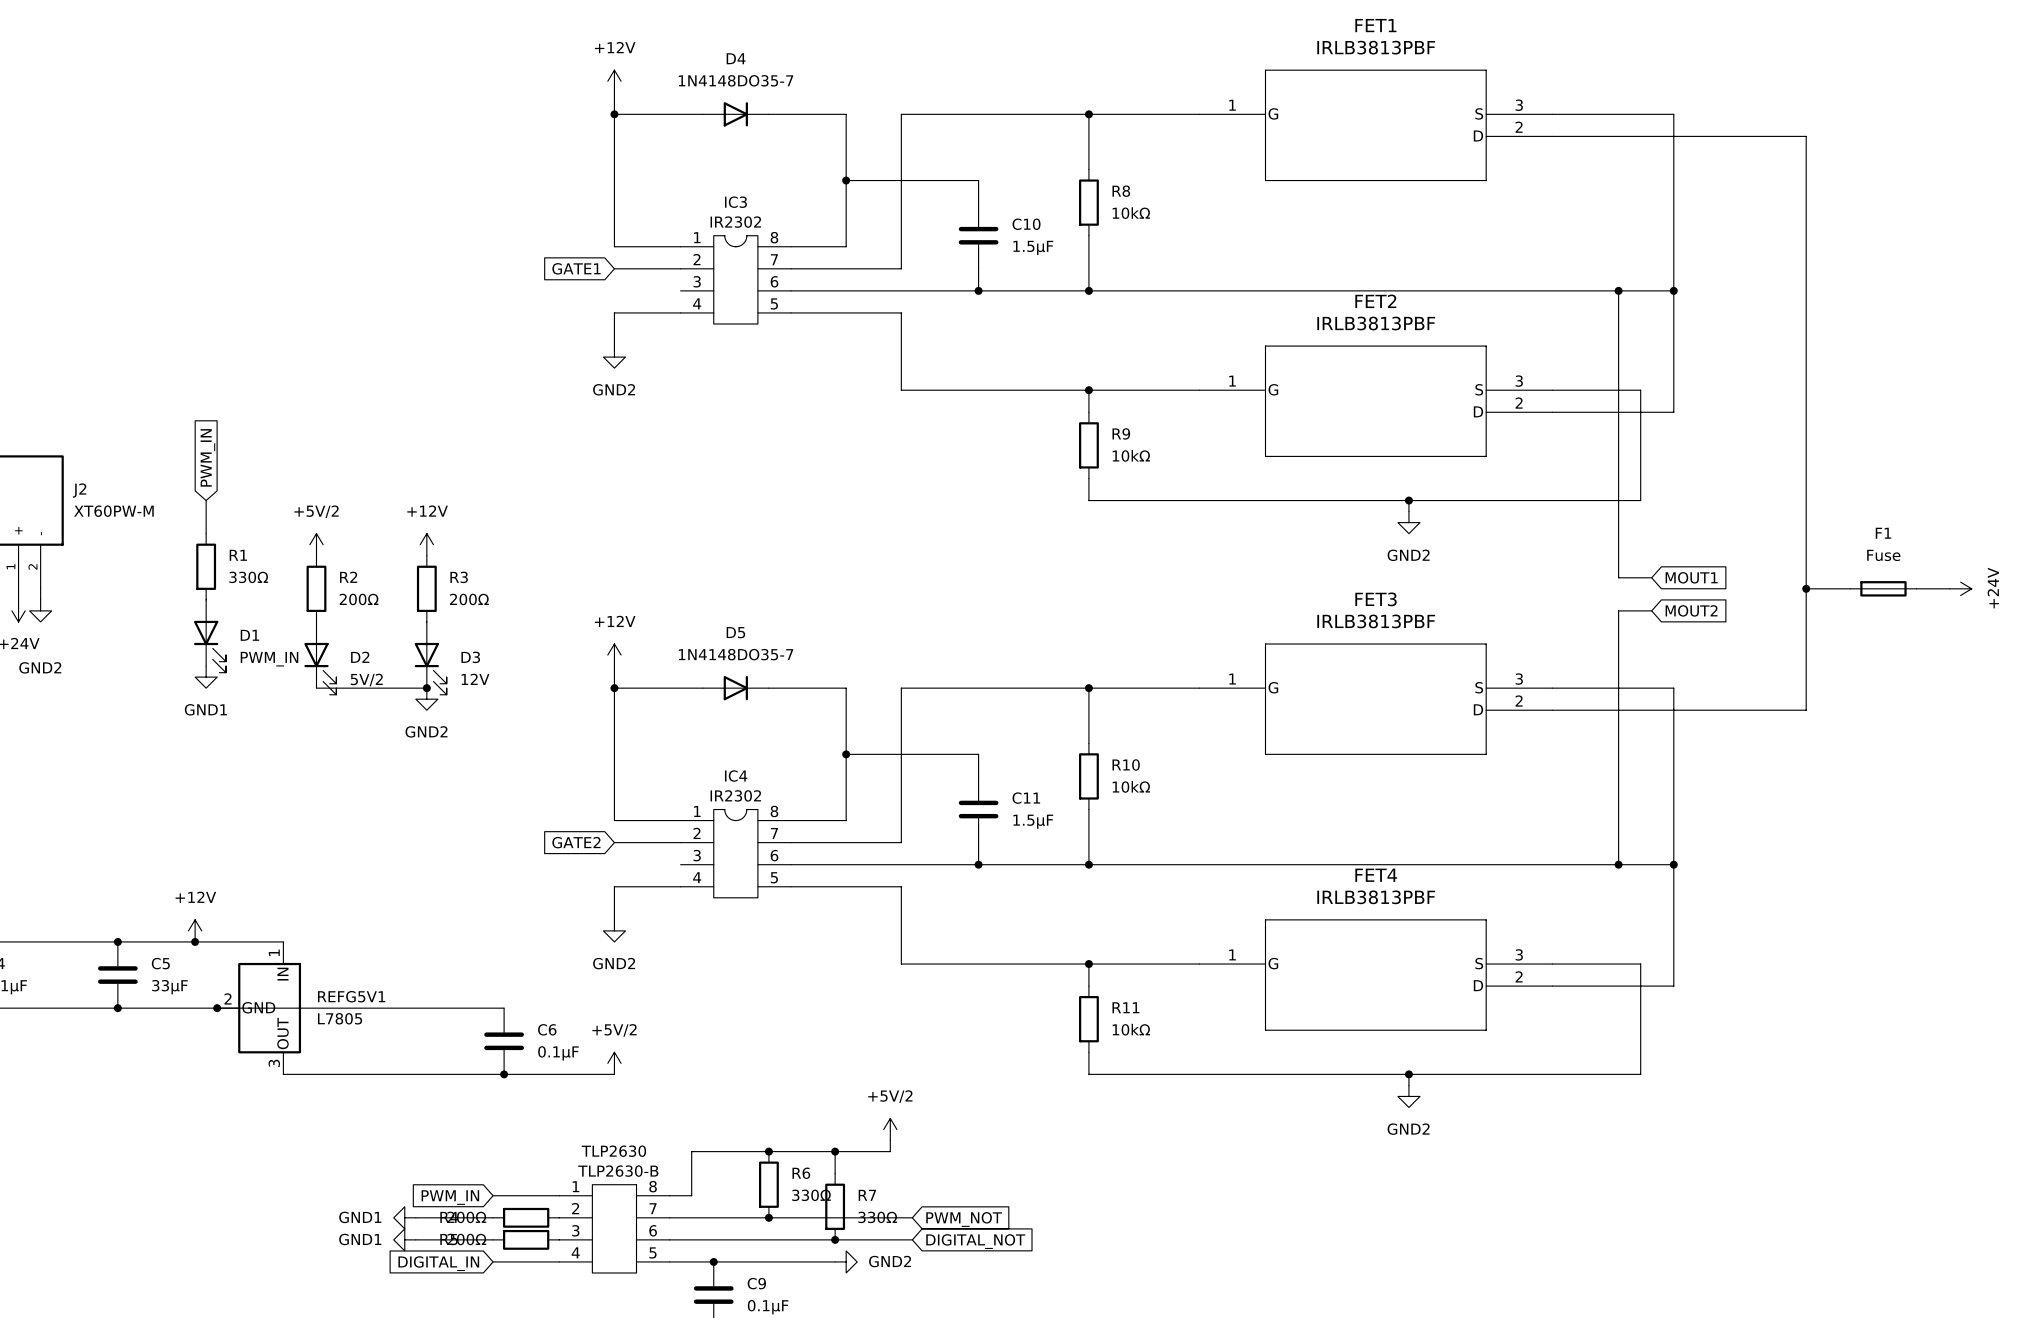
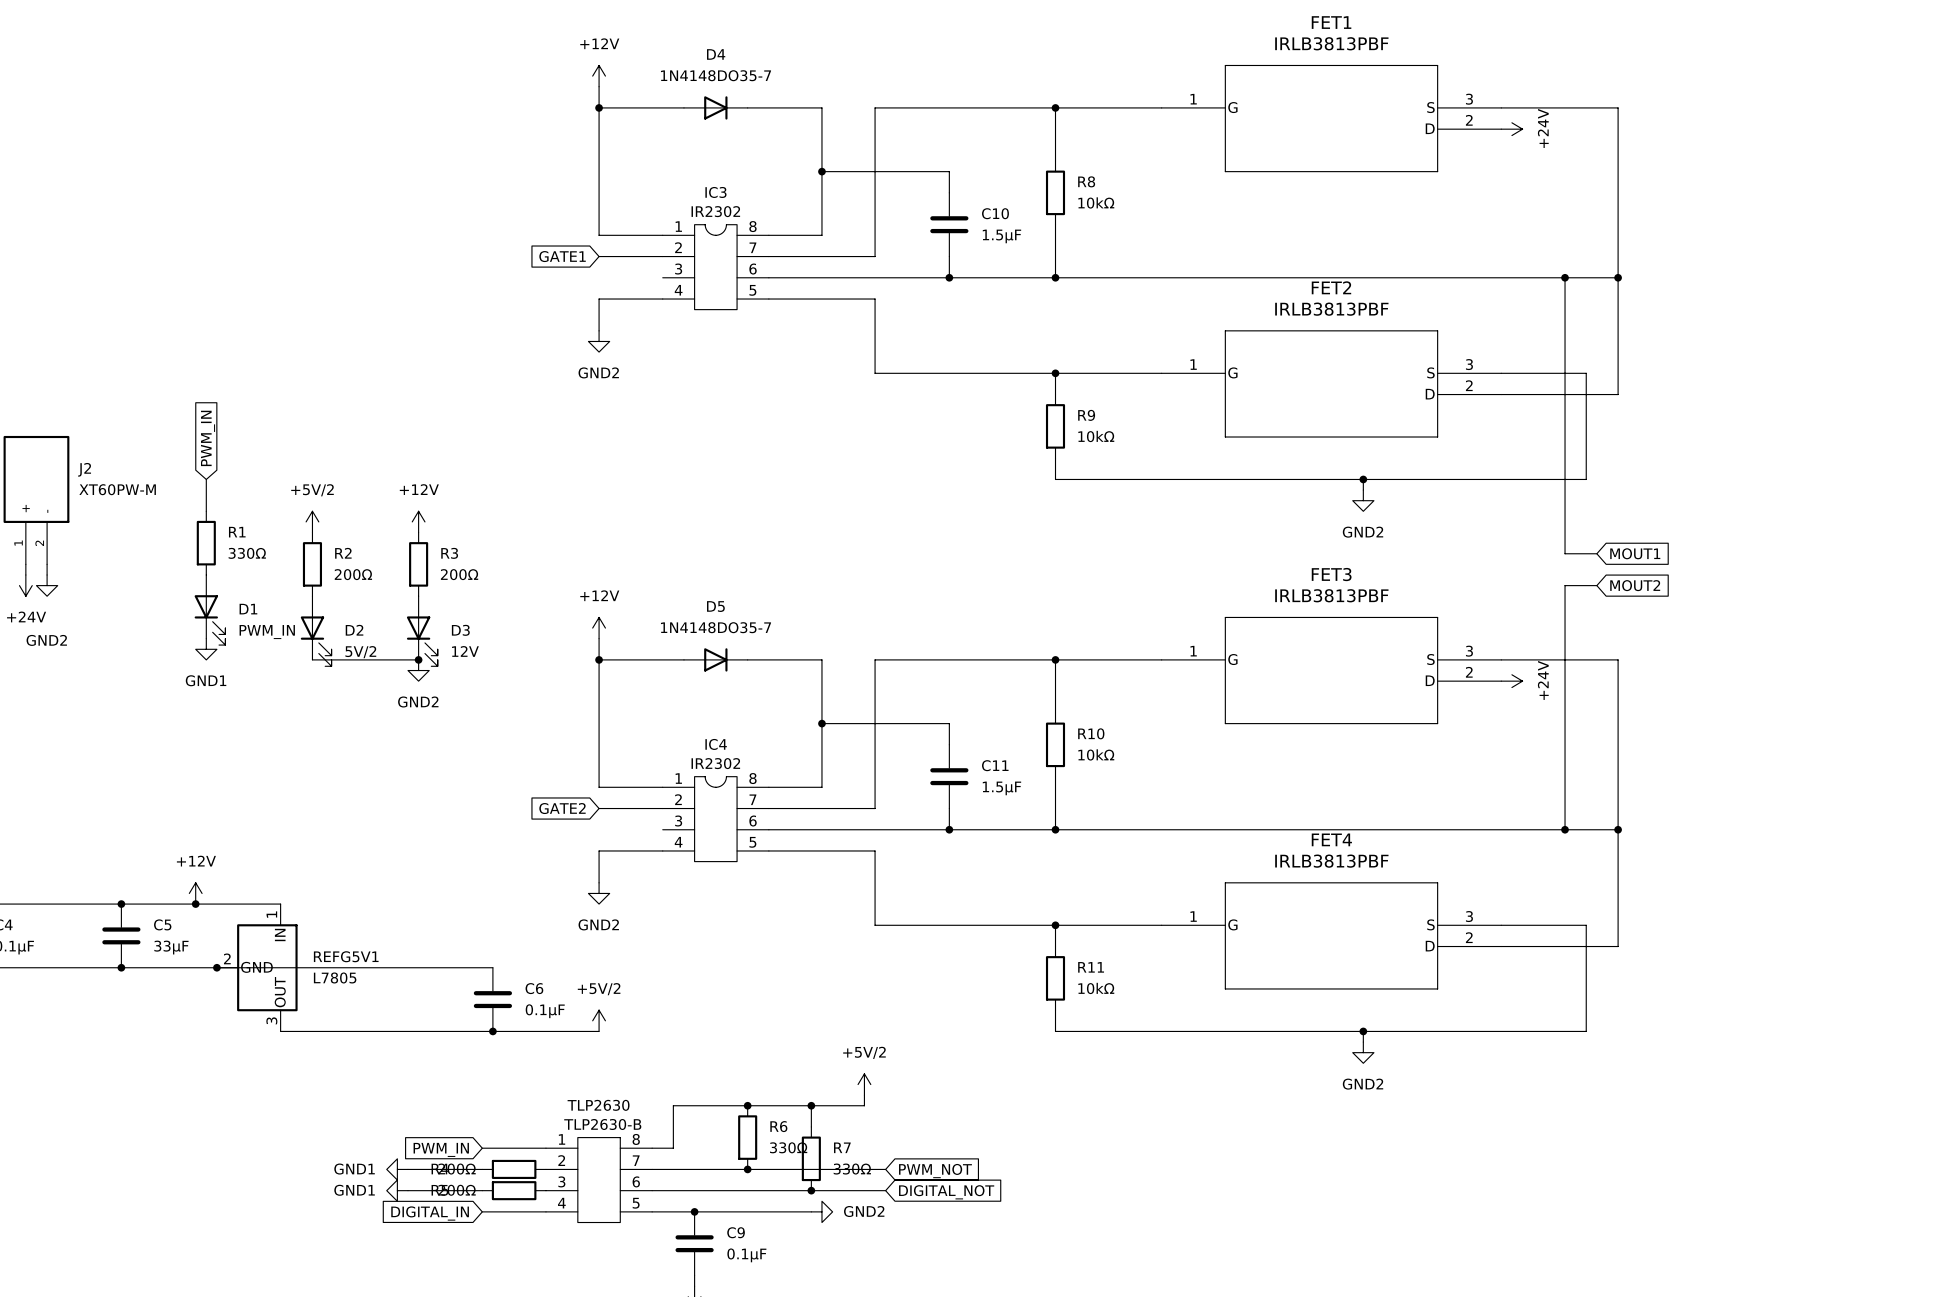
wire: (1552, 136) (1806, 136) (1806, 710) (1552, 710) -> none
power symbol: none -> +24V (1511, 129)
wire: (1806, 588) (1850, 588) -> none
junction: (1806, 588) -> none
F1: Fuse (1883, 588) -> none
wire: (1916, 588) (1949, 588) -> none
power symbol: +24V (1960, 588) -> none
power symbol: none -> +24V (1511, 681)

